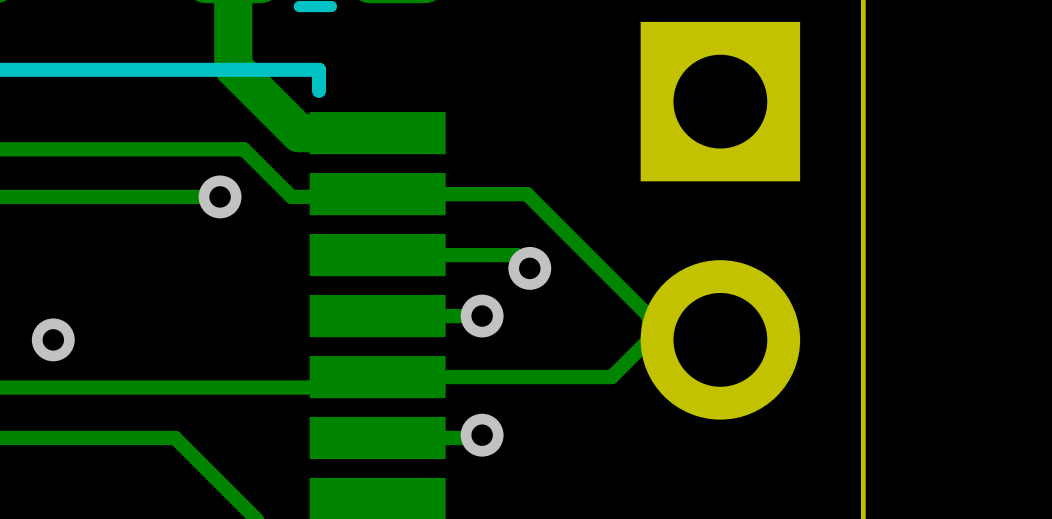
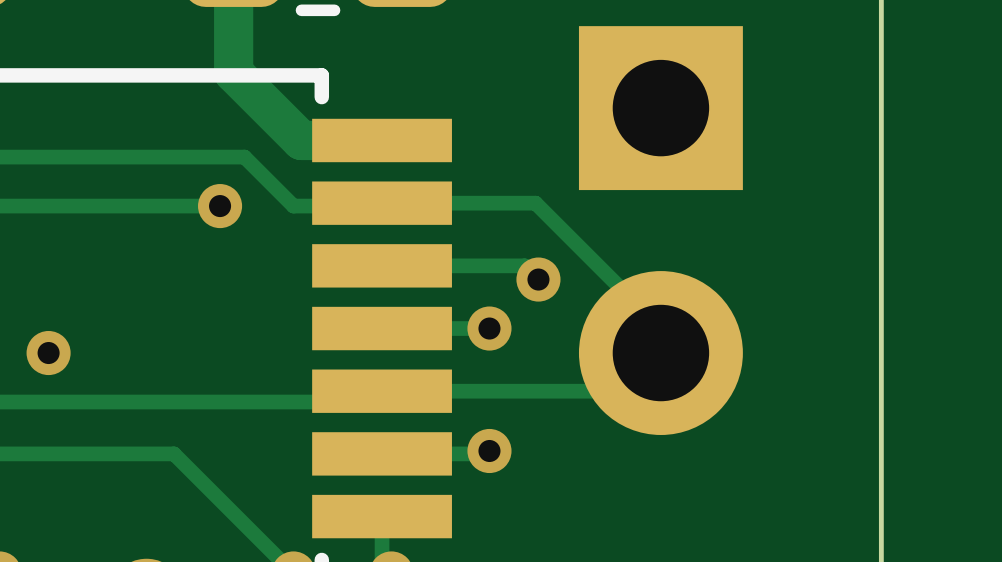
part position: (720, 220) -> (660, 230)

